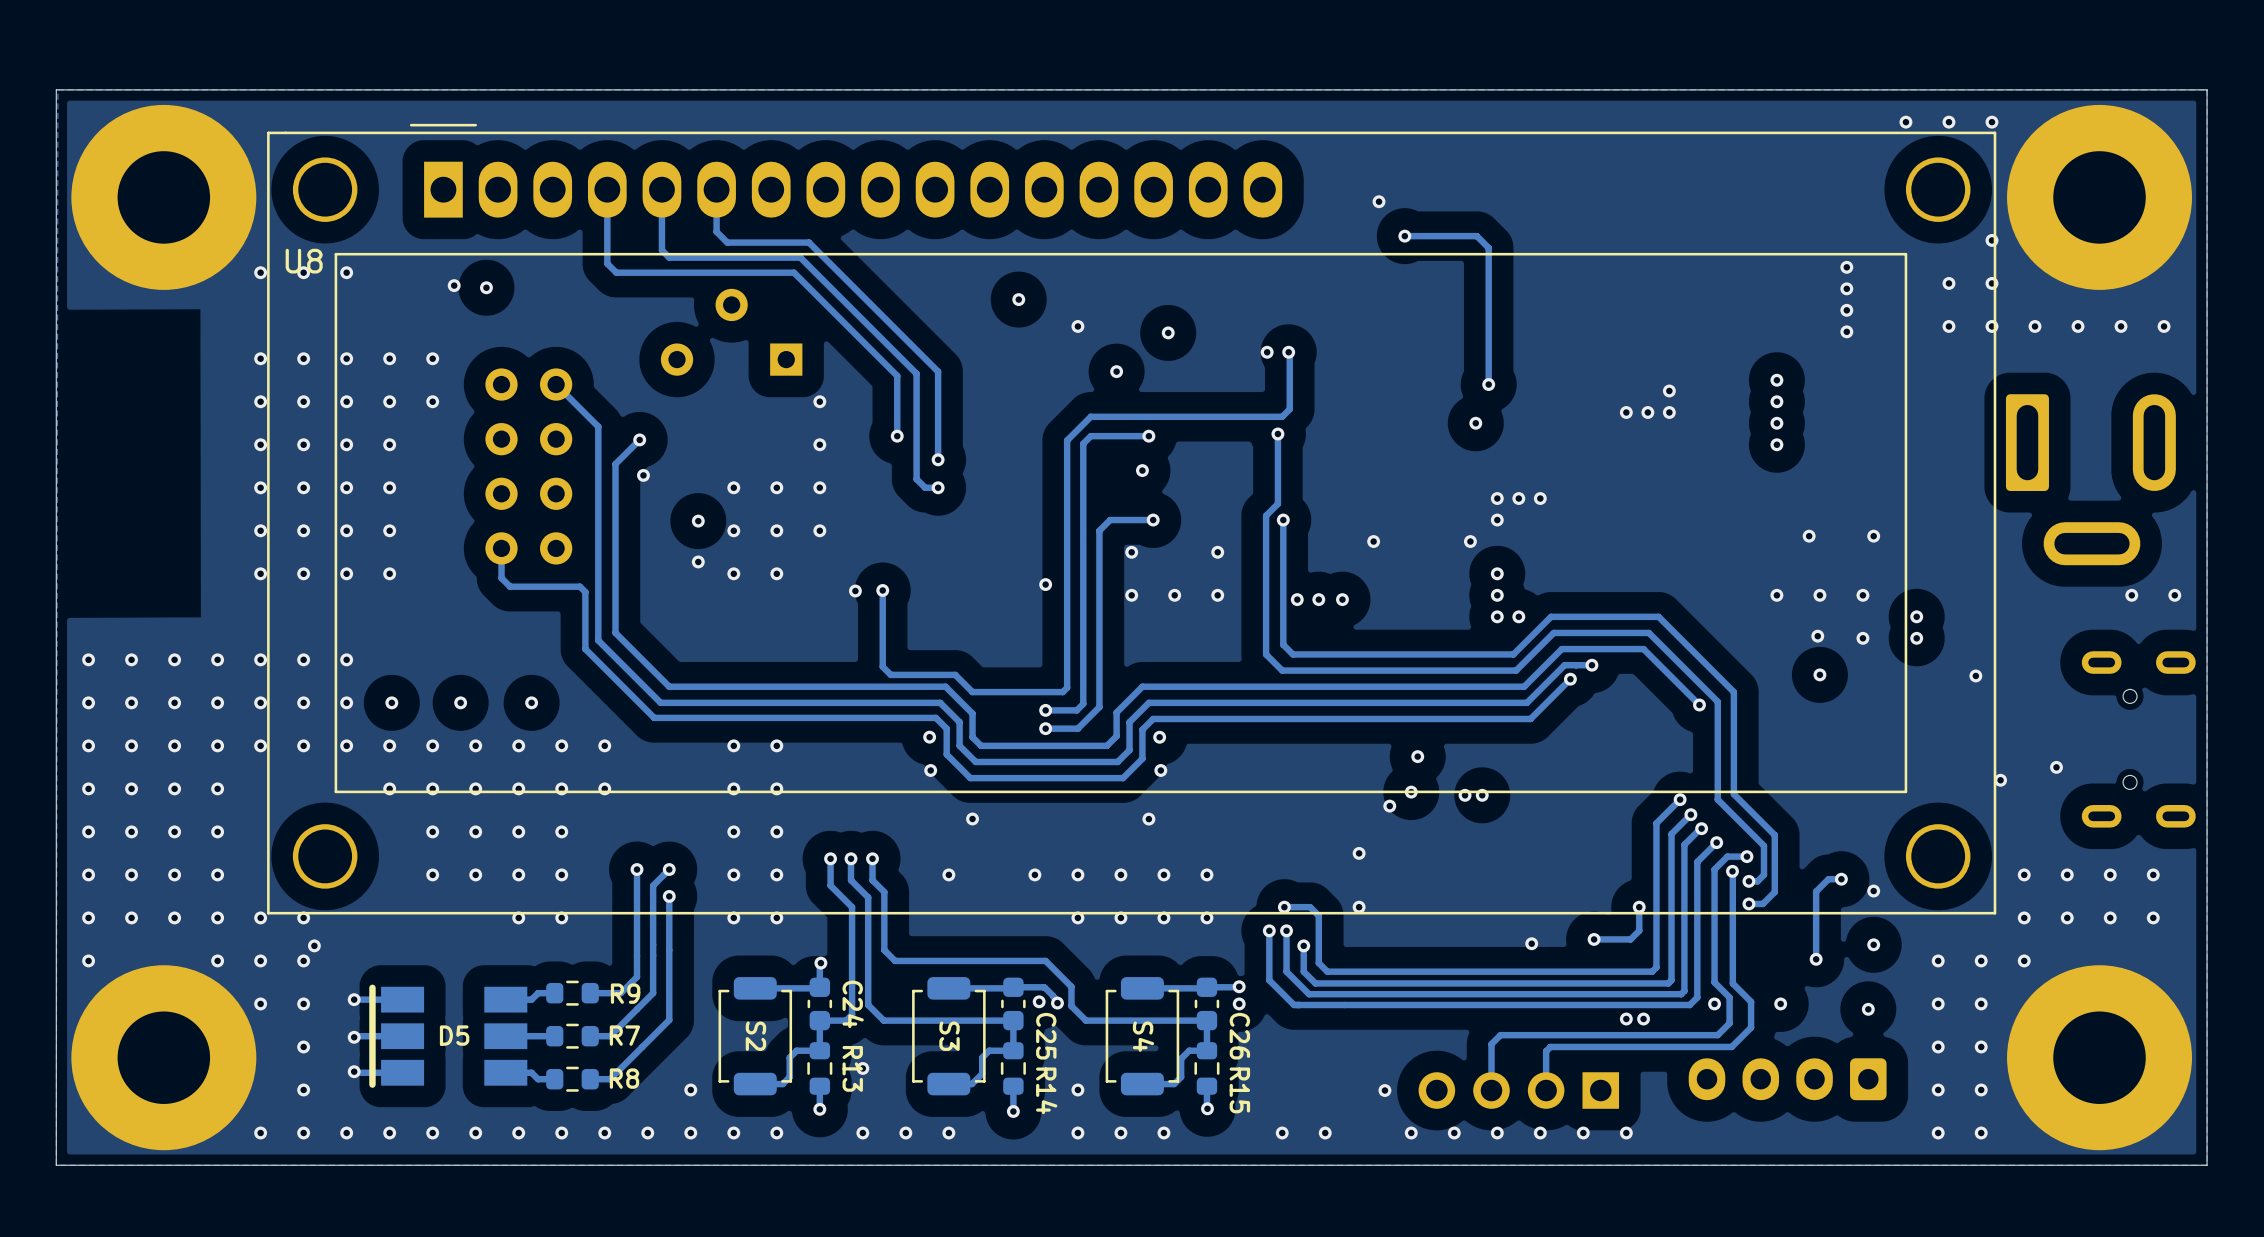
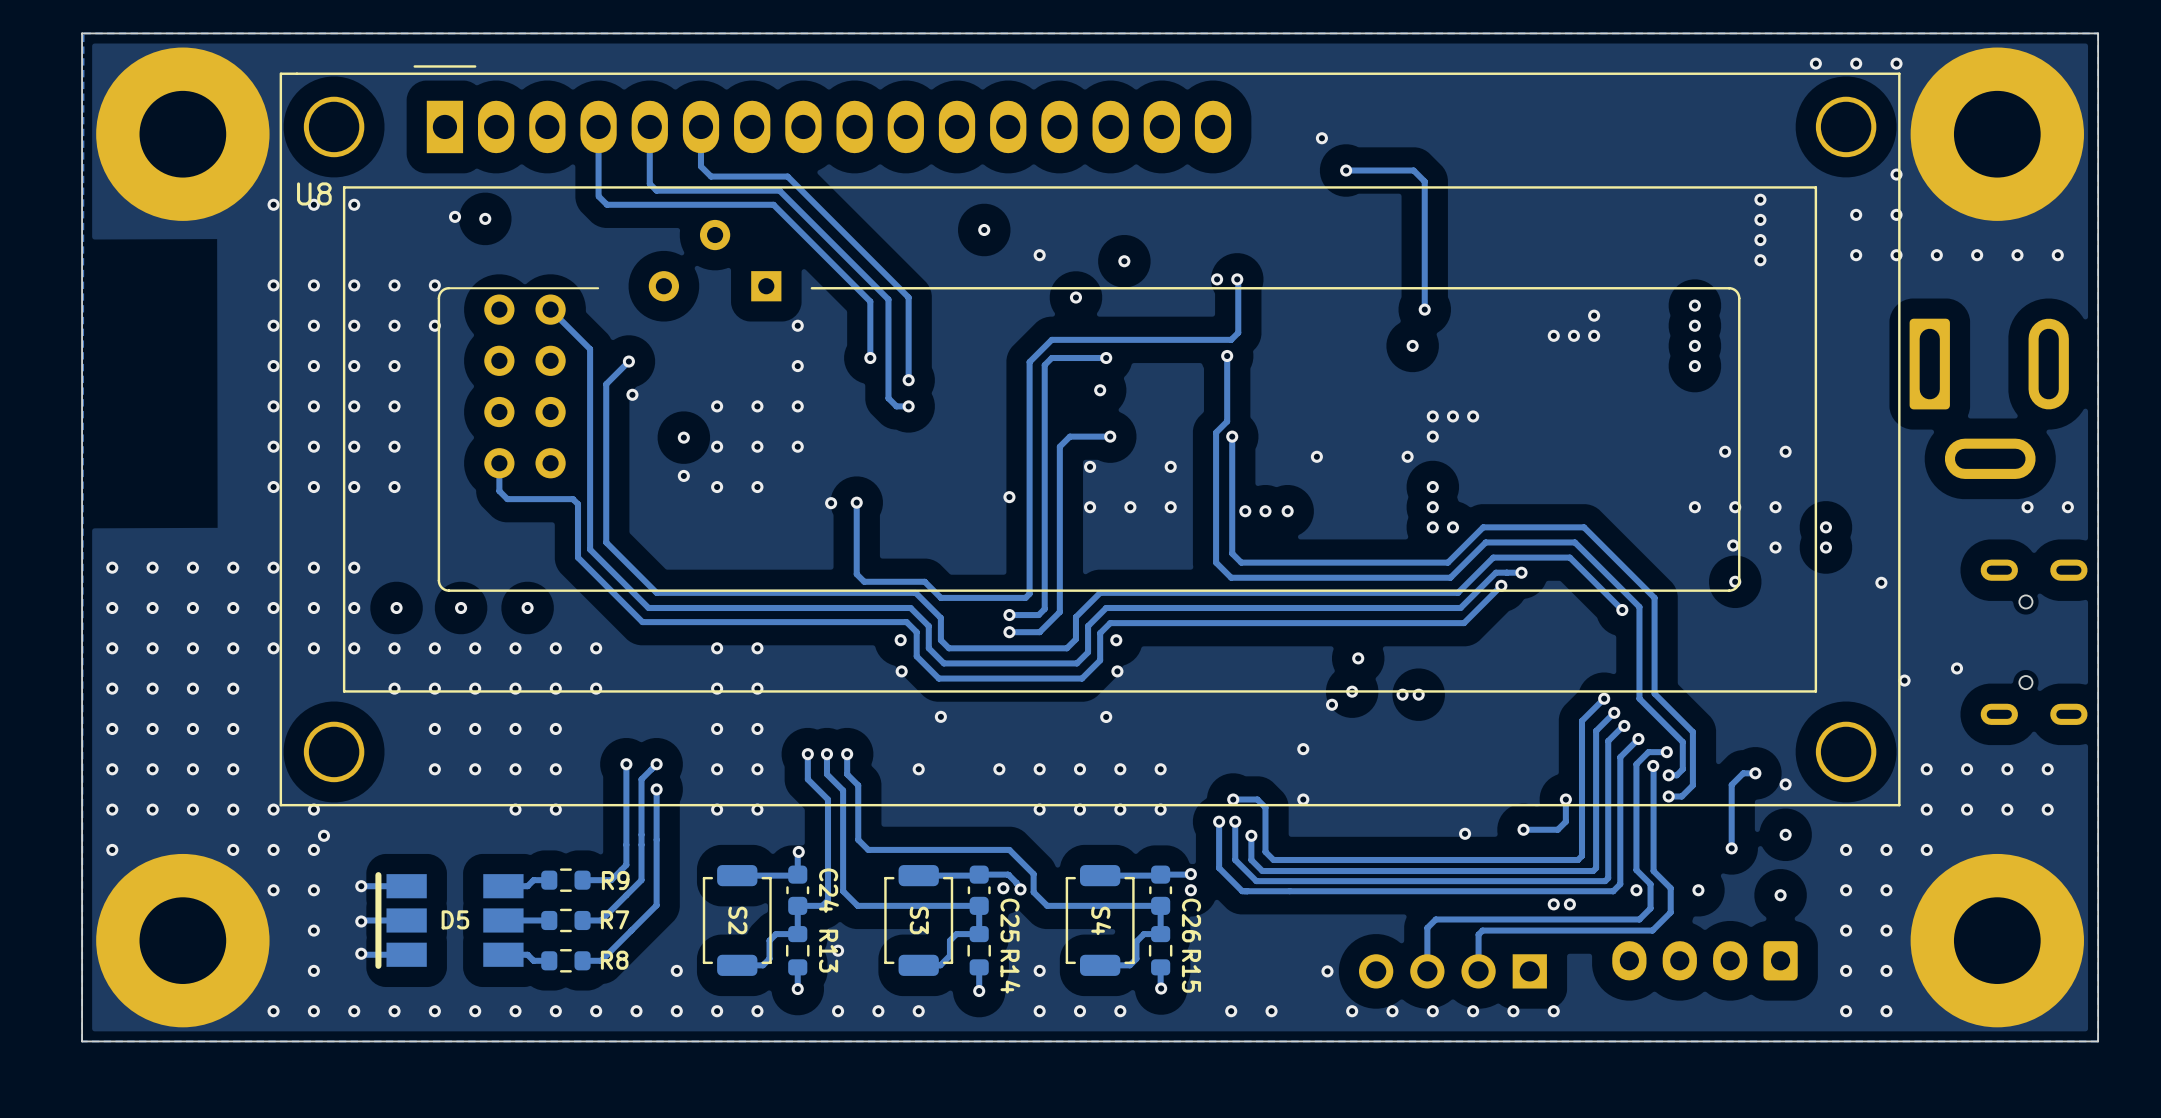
U8 footprint: [267, 123, 1997, 915] -> [279, 65, 1901, 807]

